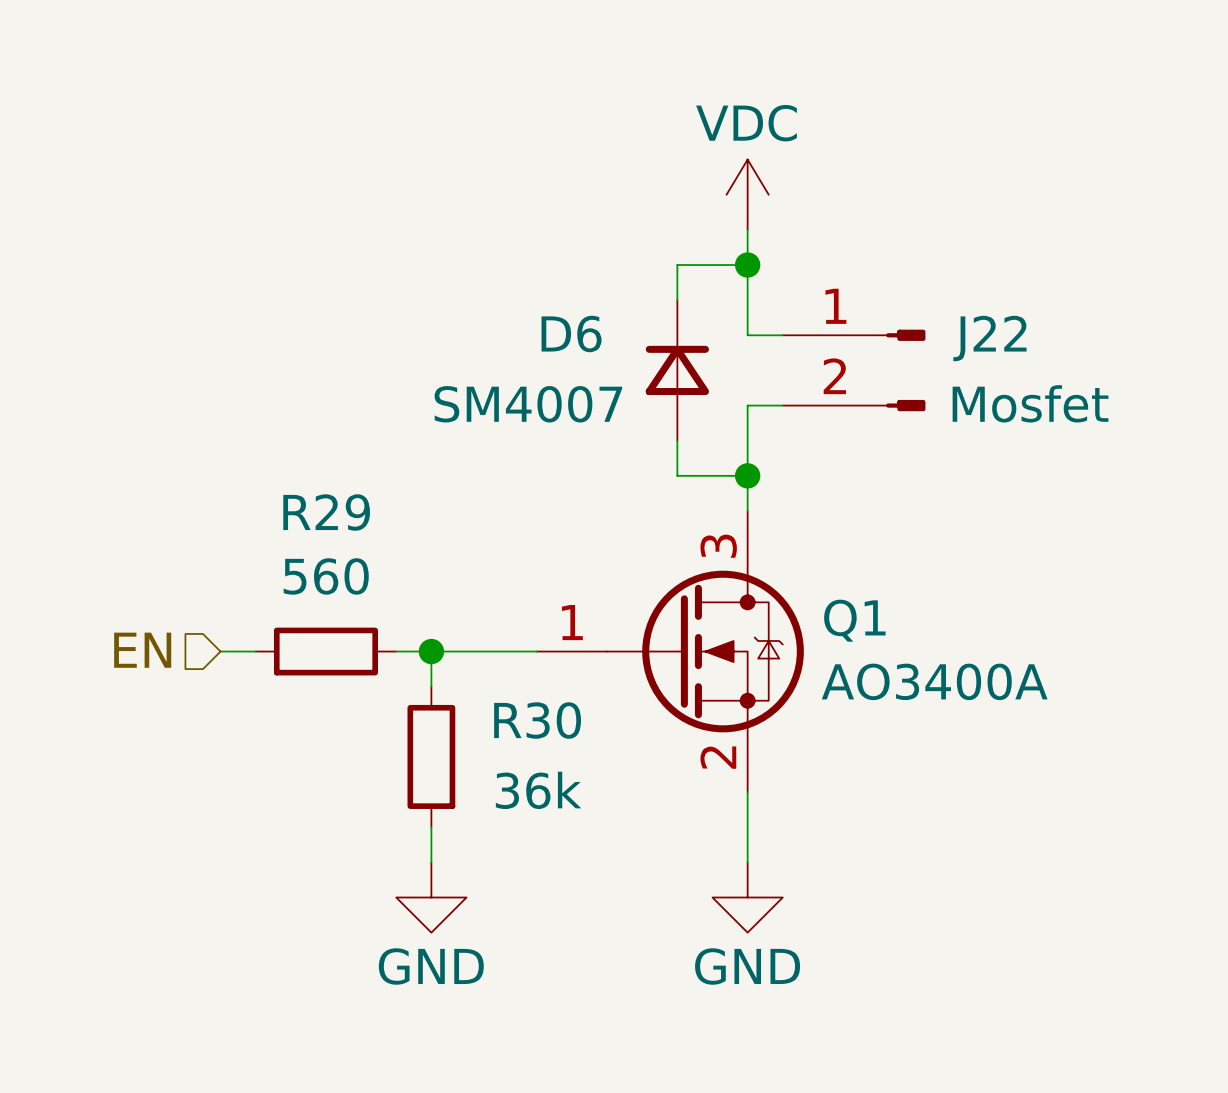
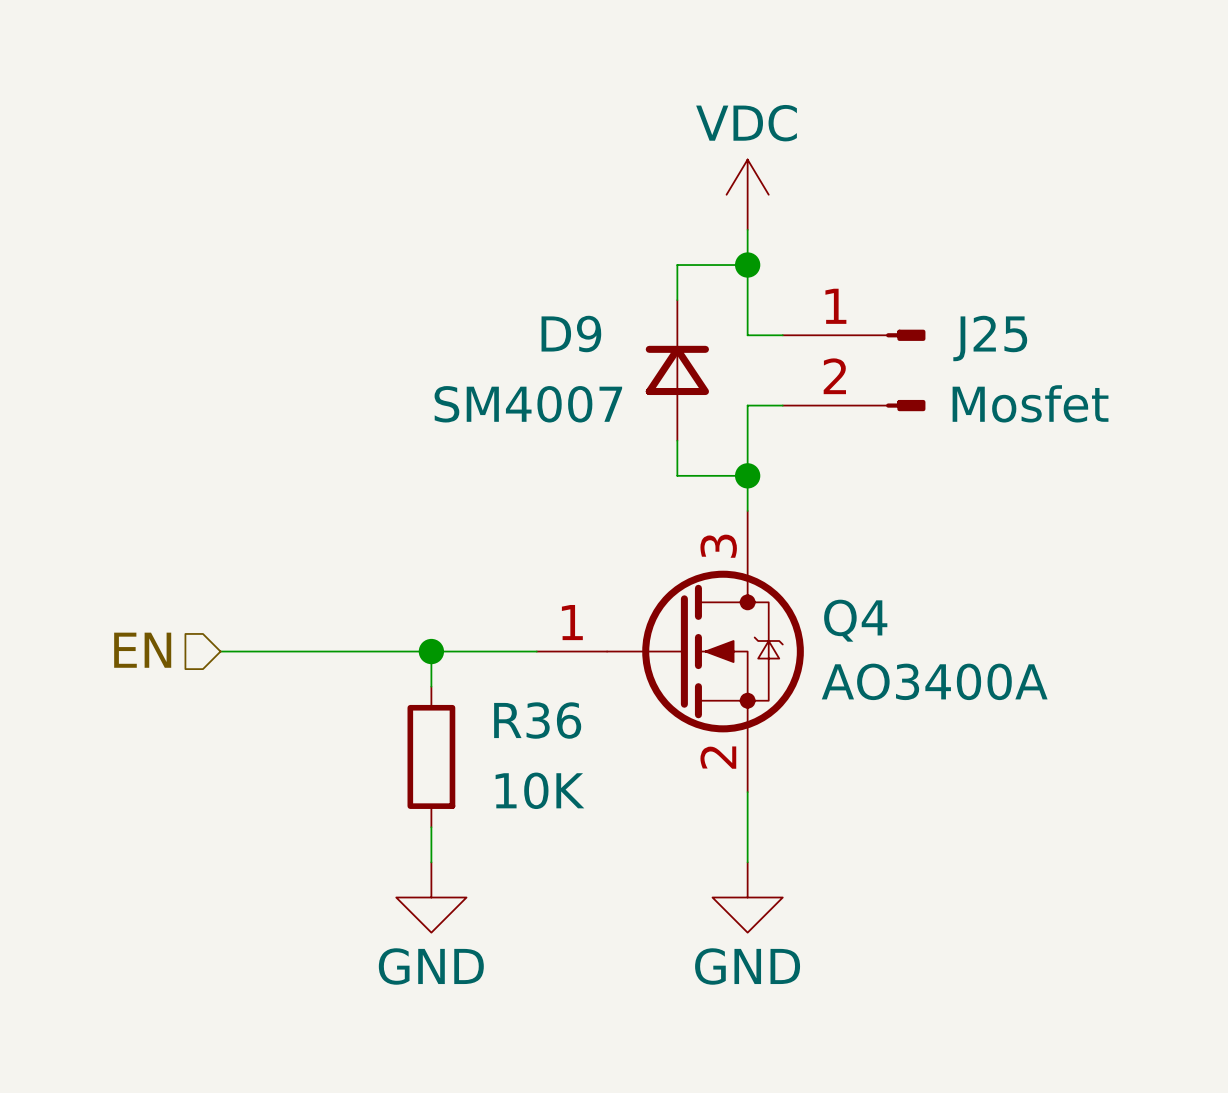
D6 name: D6 (571, 334) -> D9 (571, 334)
J22 name: J22 (989, 338) -> J25 (990, 338)
Q1 name: Q1 (854, 620) -> Q4 (855, 620)
wire: none -> (255, 651) (396, 651)
R29: 560 (325, 651) -> none
R30 name: R30 (537, 720) -> R36 (537, 720)
R30 value: 36k (538, 790) -> 10K (539, 790)

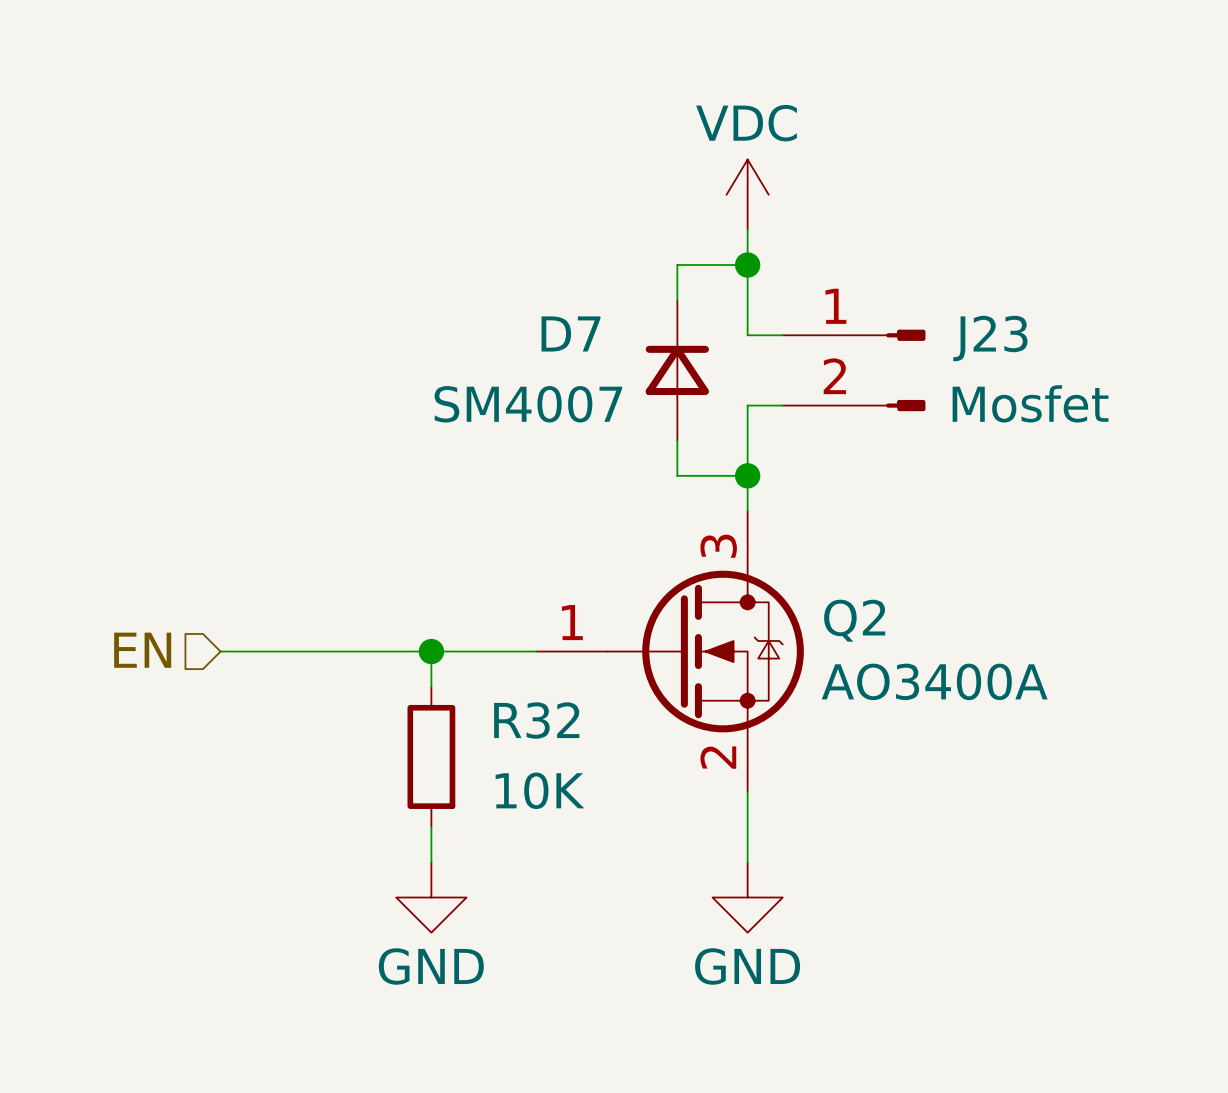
D9 name: D9 (571, 334) -> D7 (571, 333)
J25 name: J25 (990, 338) -> J23 (990, 338)
Q4 name: Q4 (855, 620) -> Q2 (854, 620)
R36 name: R36 (537, 720) -> R32 (536, 720)

